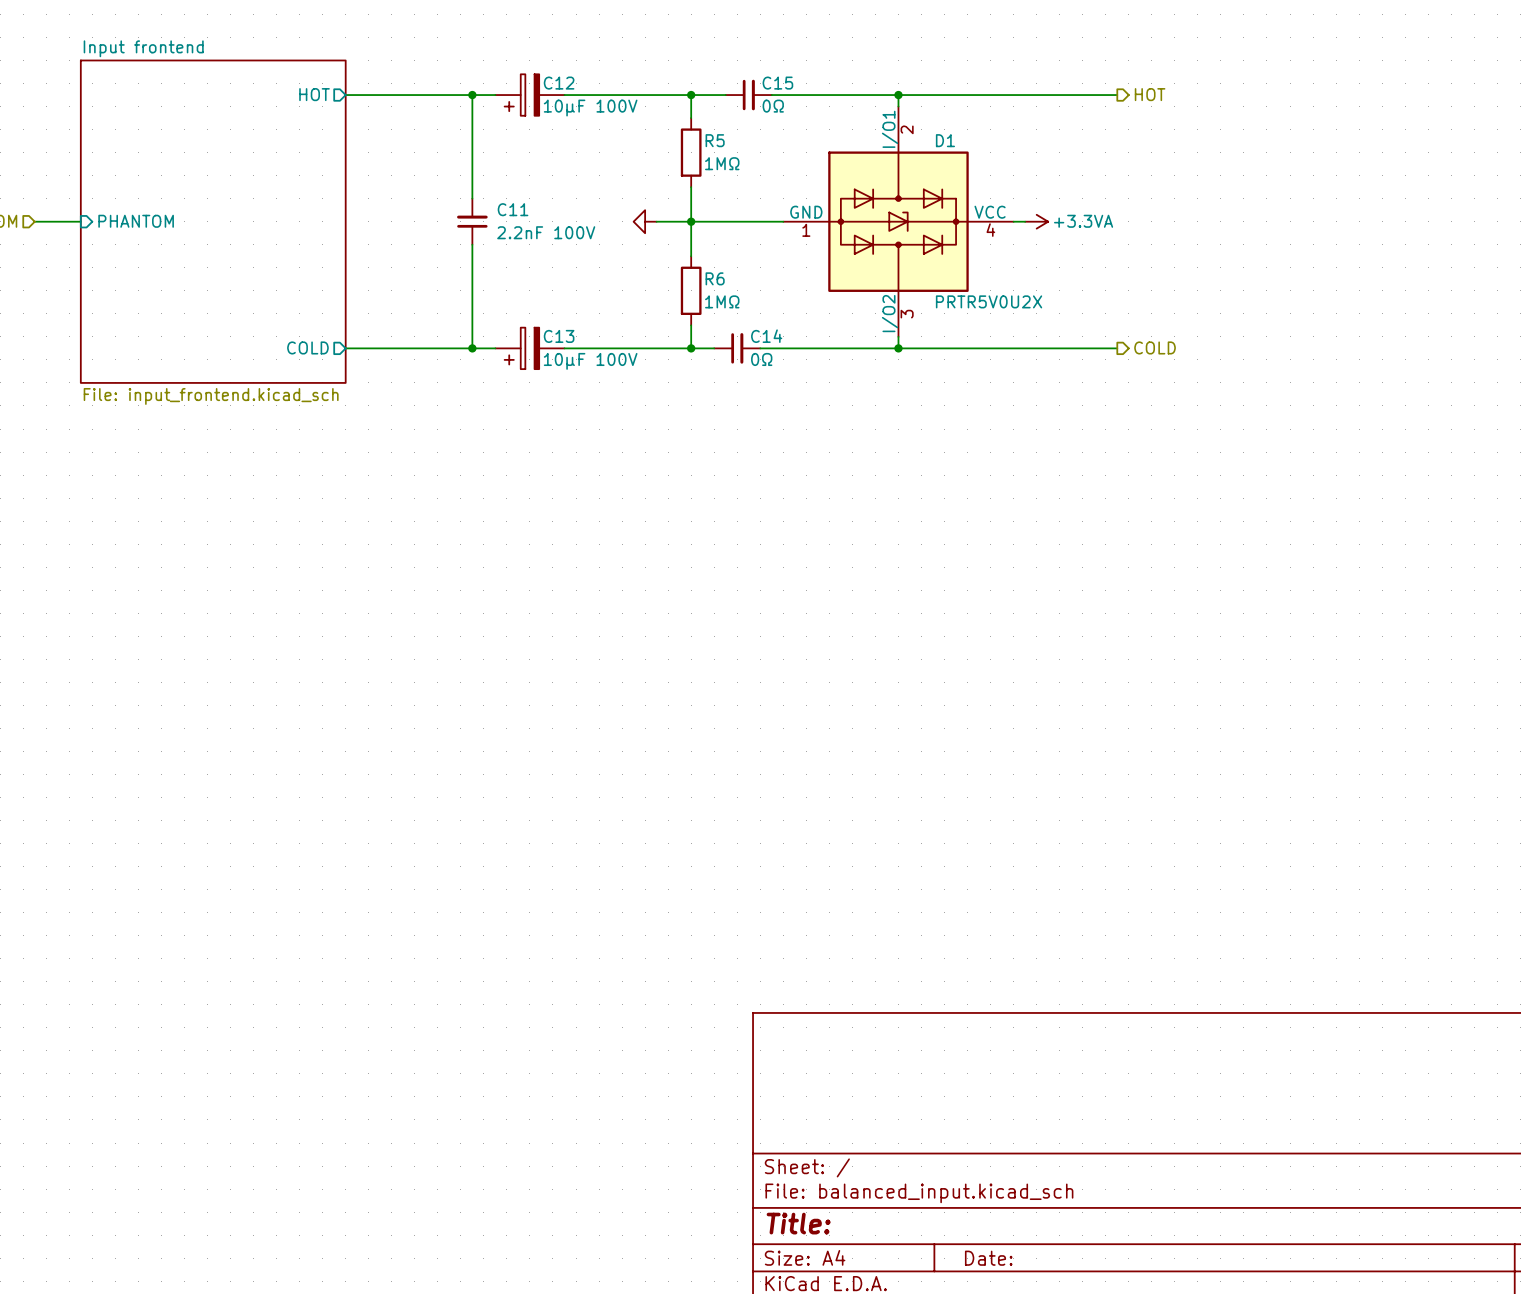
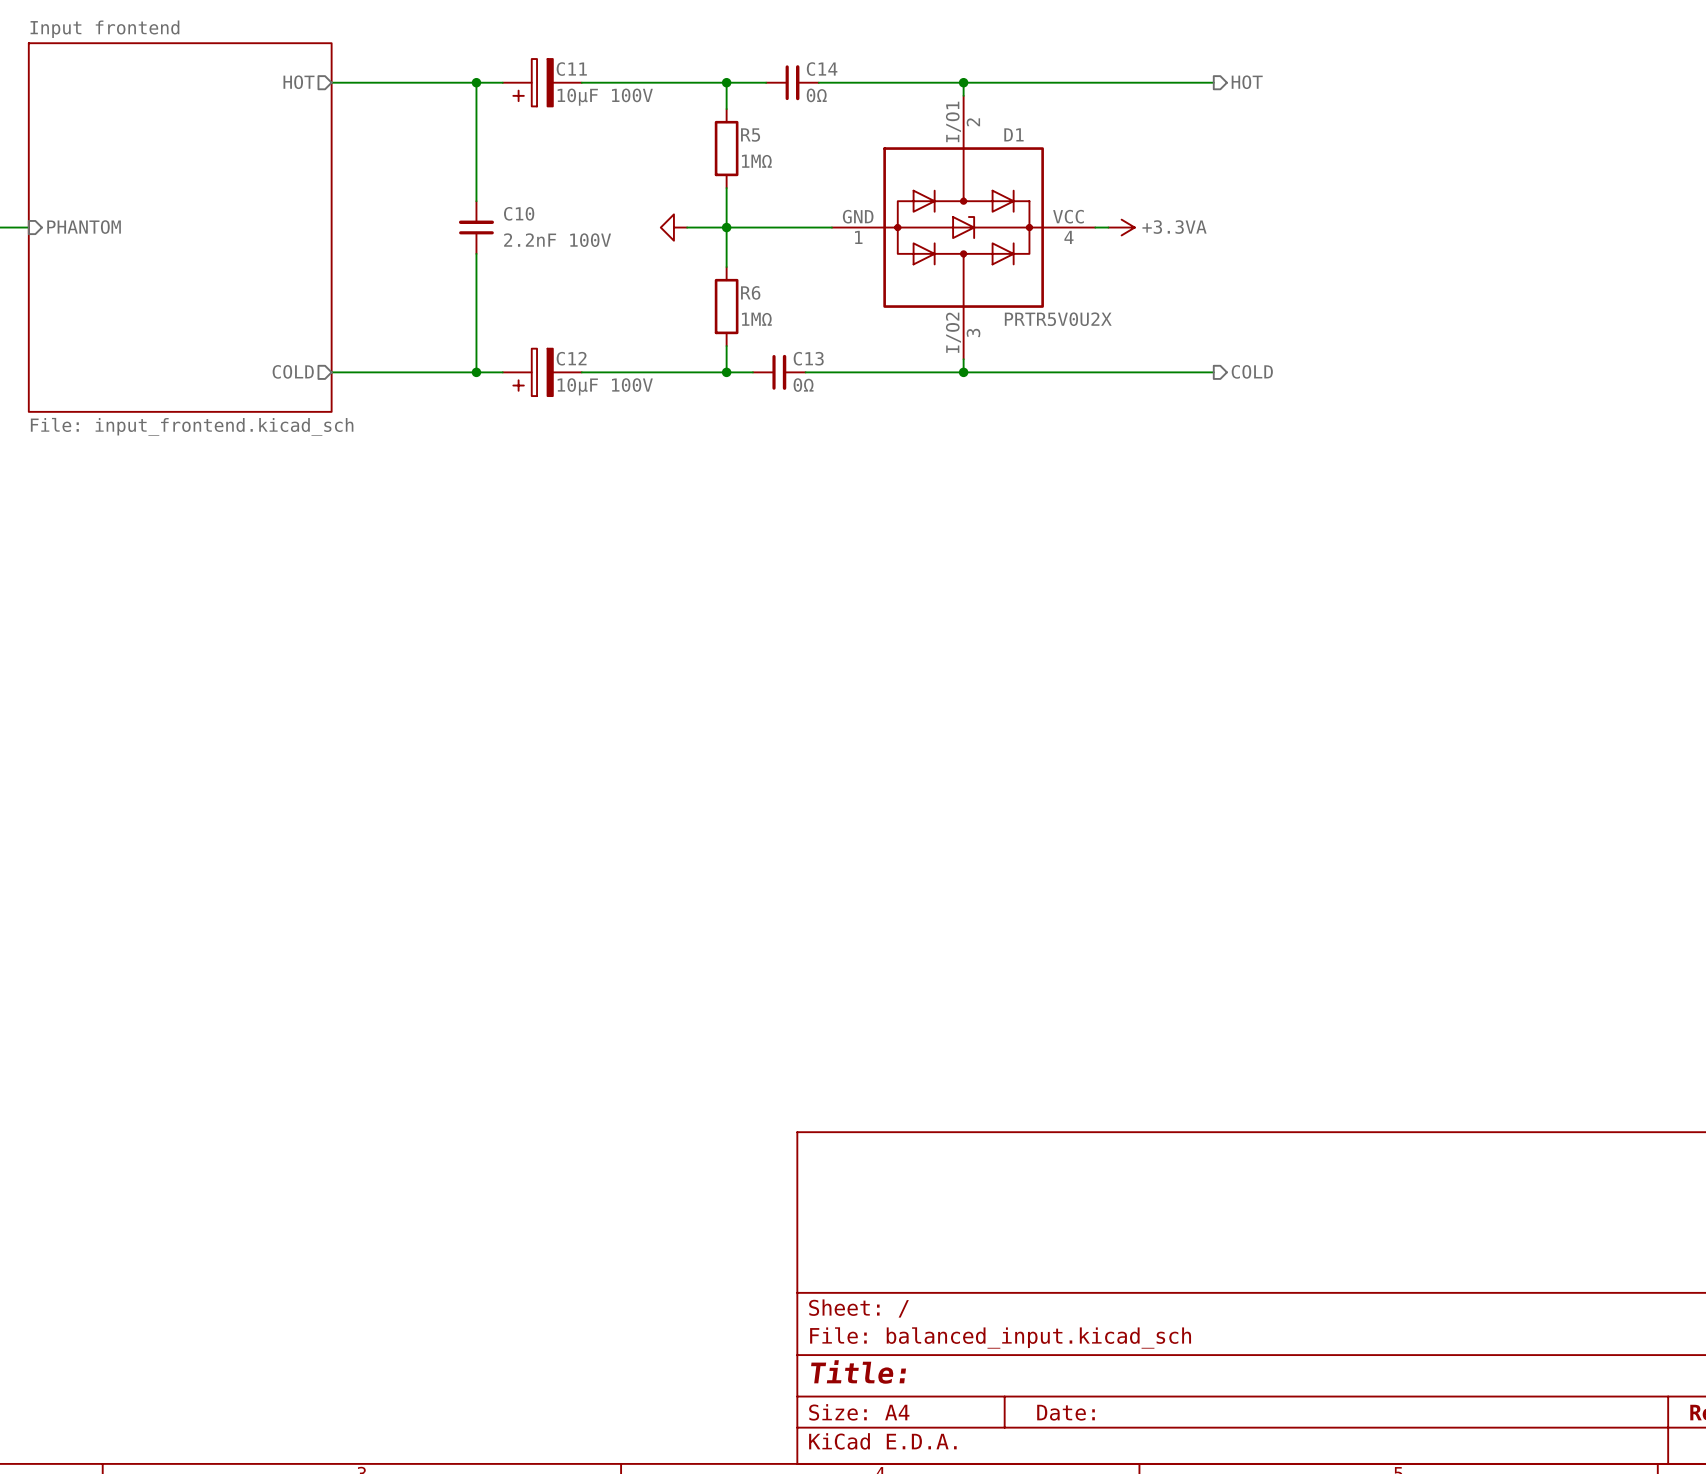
C12 name: C12 (559, 83) -> C11 (571, 69)
C15 name: C15 (777, 83) -> C14 (822, 69)
C11 name: C11 (513, 209) -> C10 (519, 213)
C13 name: C13 (559, 336) -> C12 (571, 358)
C14 name: C14 (766, 336) -> C13 (808, 358)

